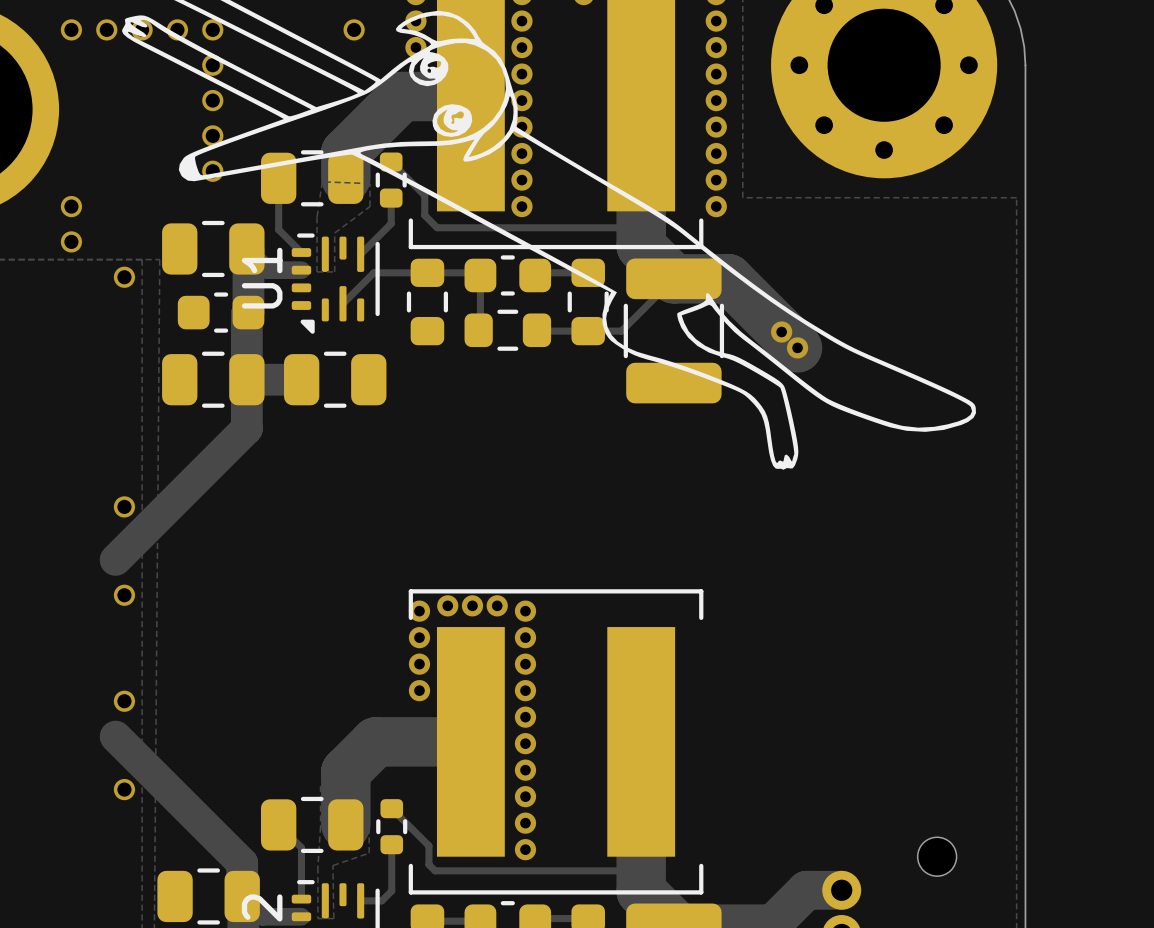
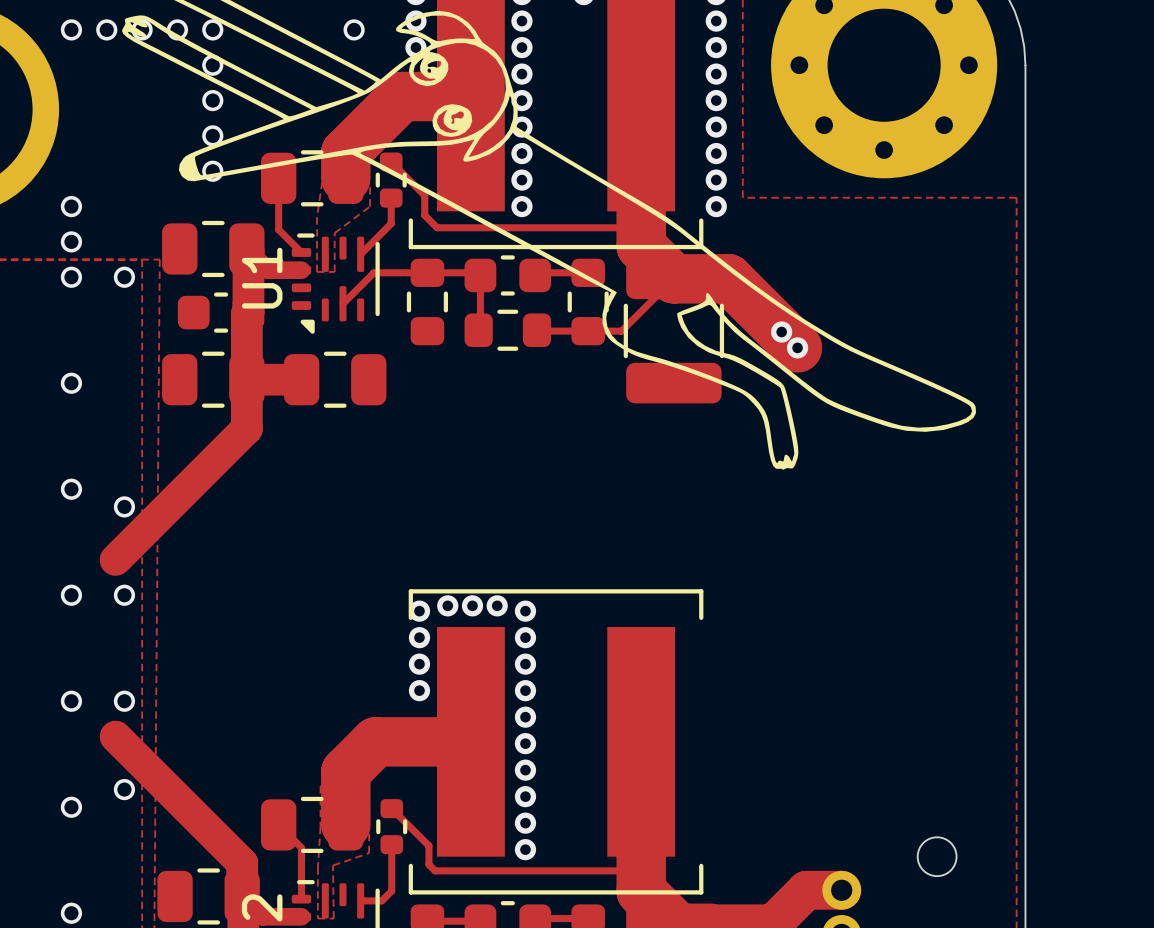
via: none -> (71, 277)
via: none -> (71, 383)
via: none -> (71, 489)
via: none -> (71, 595)
via: none -> (71, 701)
via: none -> (71, 807)
via: none -> (71, 913)

